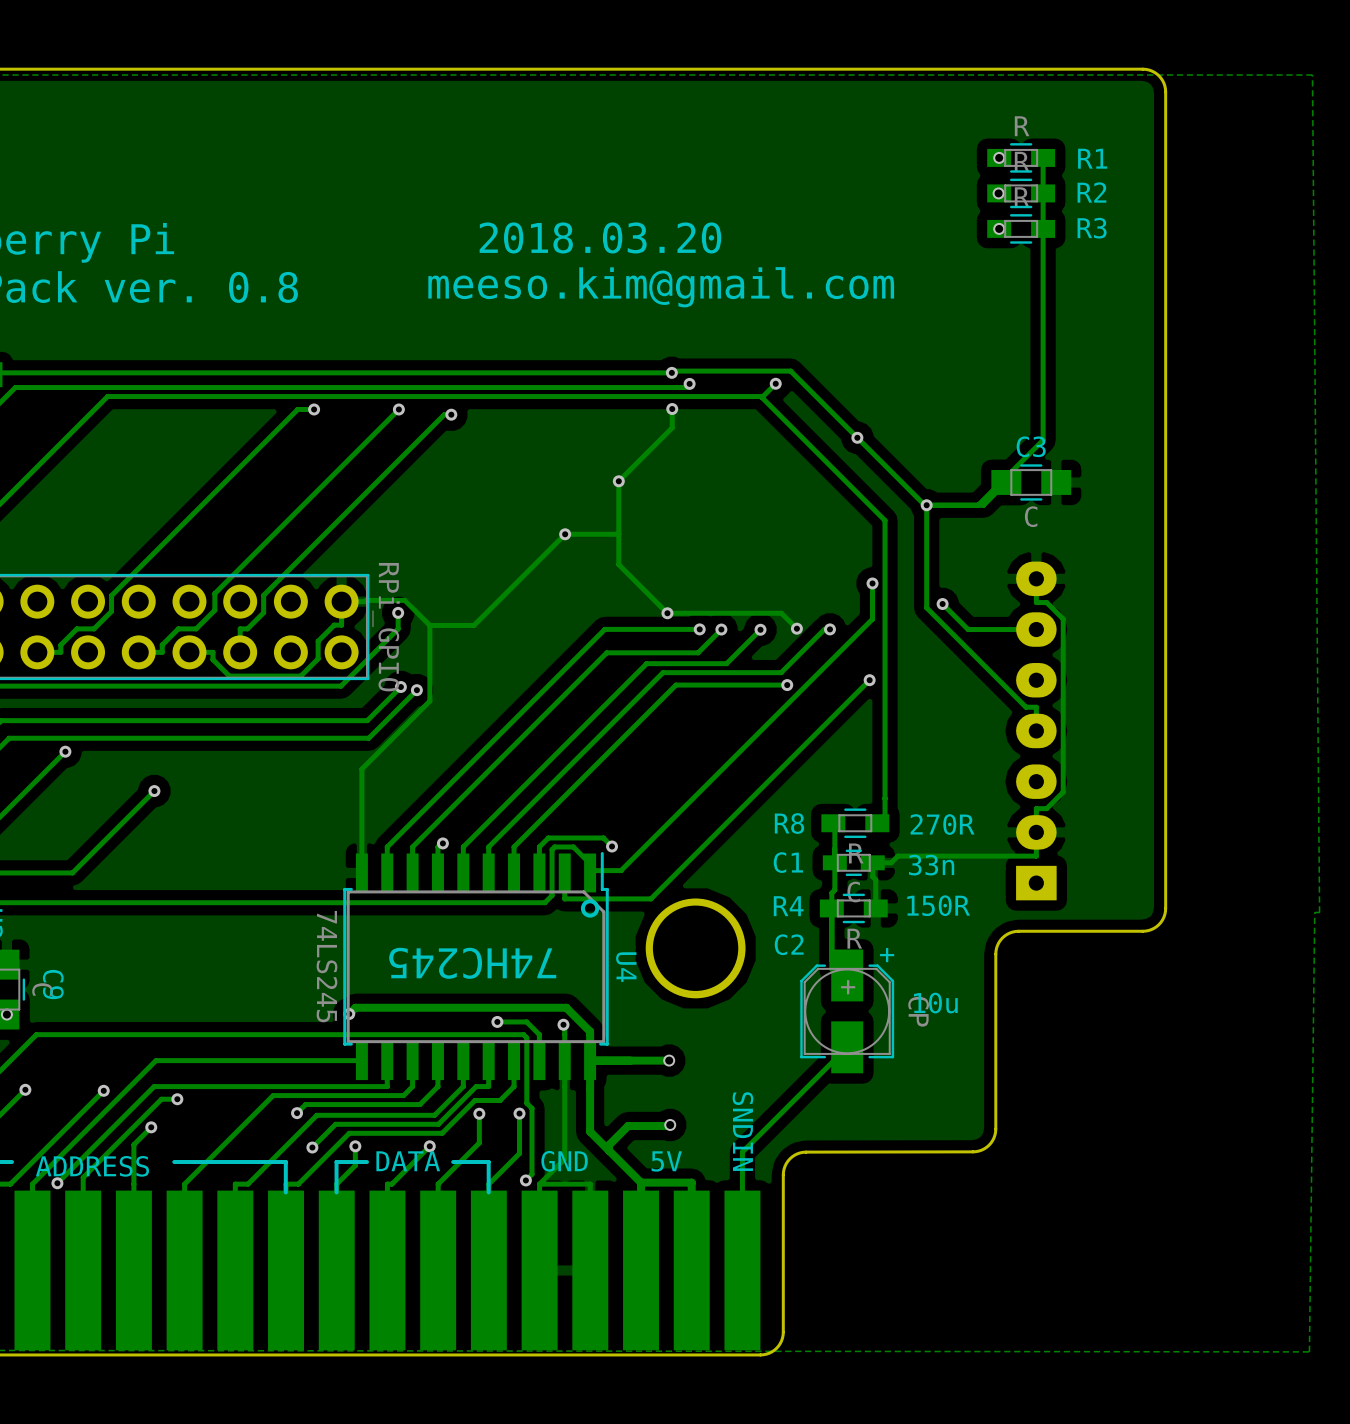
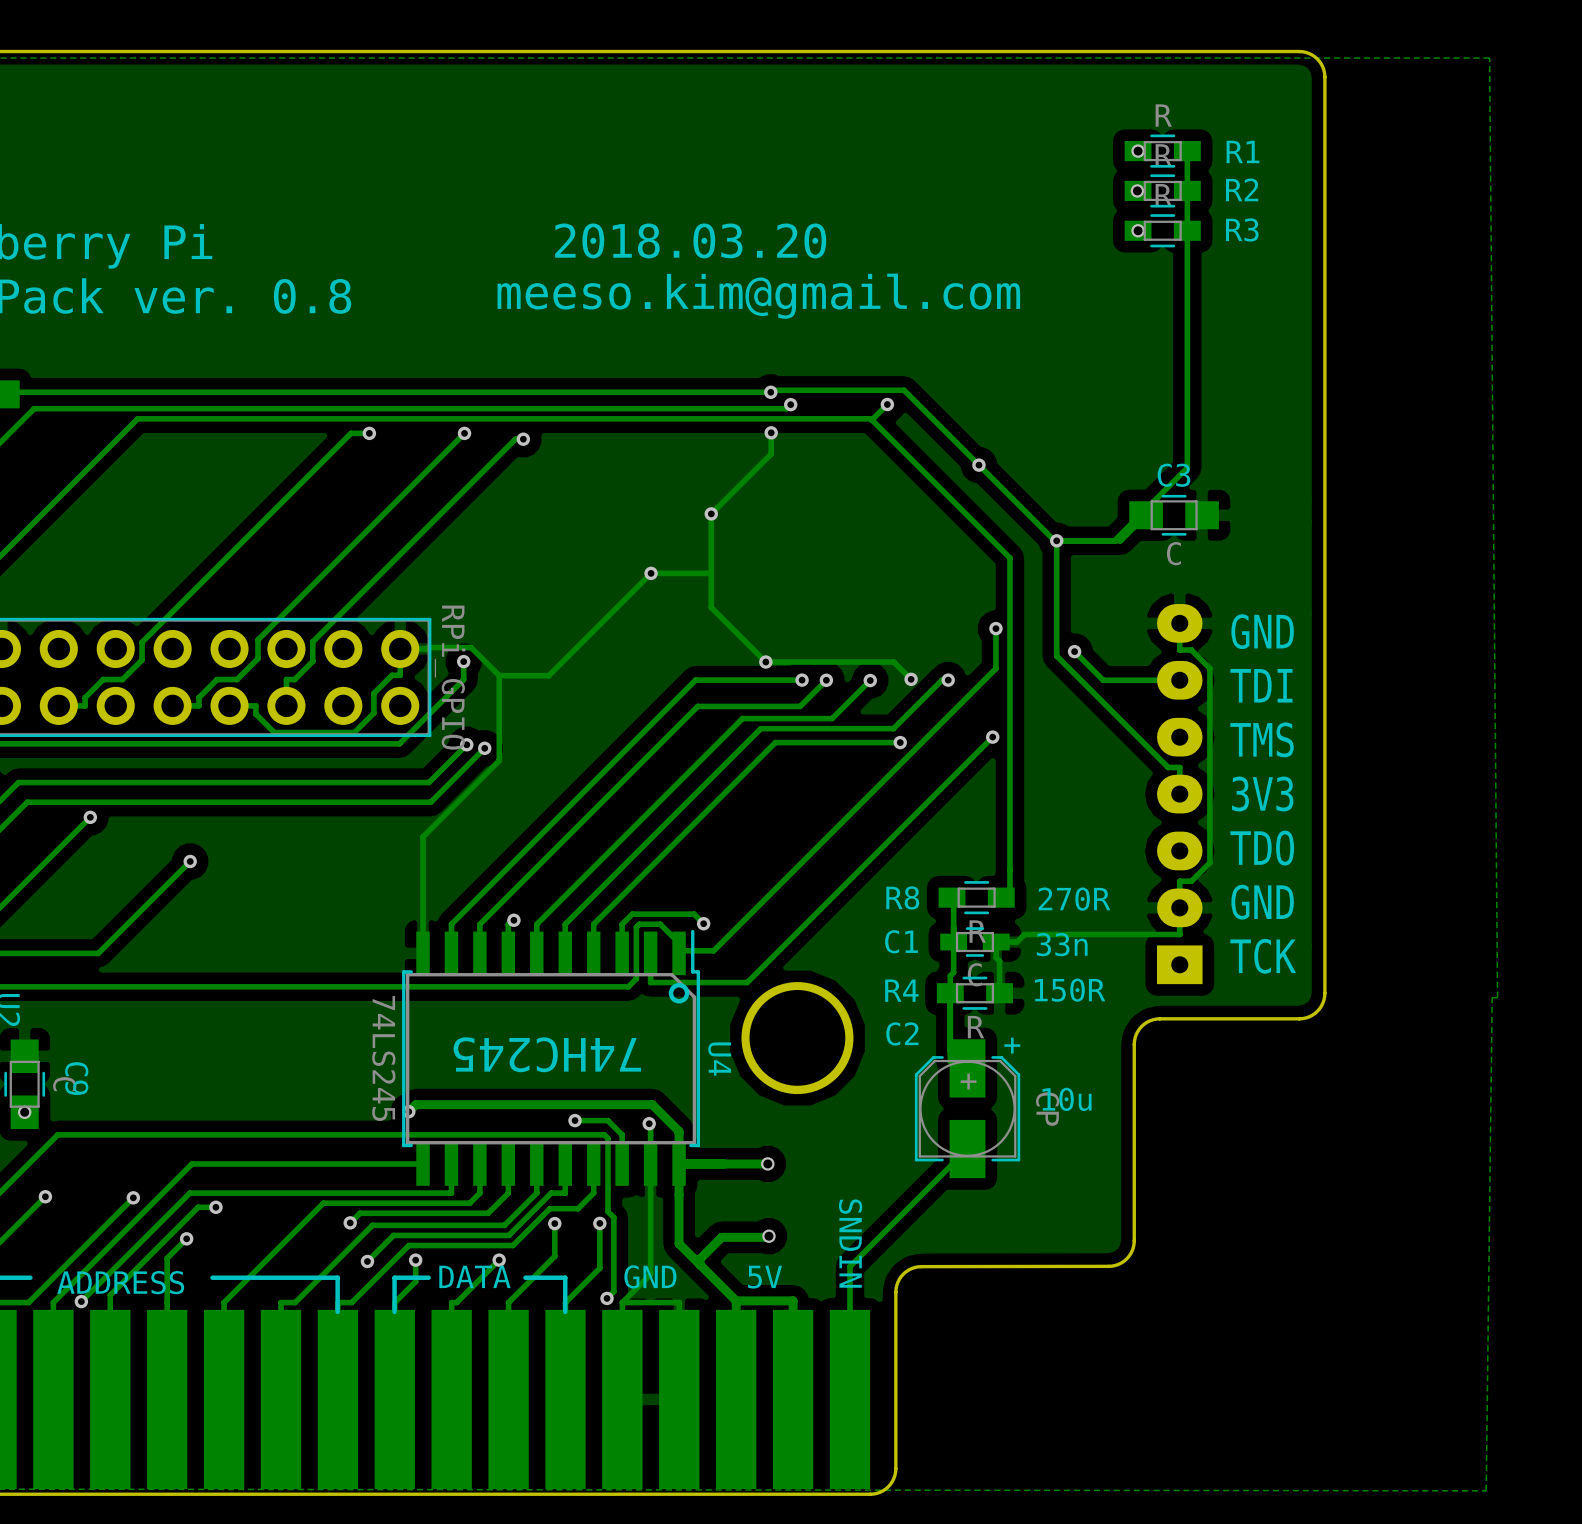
text: none -> GND (1262, 631)
text: none -> TDI (1261, 685)
text: none -> TMS (1262, 739)
text: none -> 3V3 (1262, 793)
text: none -> TDO (1262, 848)
text: none -> GND (1262, 902)
text: none -> TCK (1263, 956)

